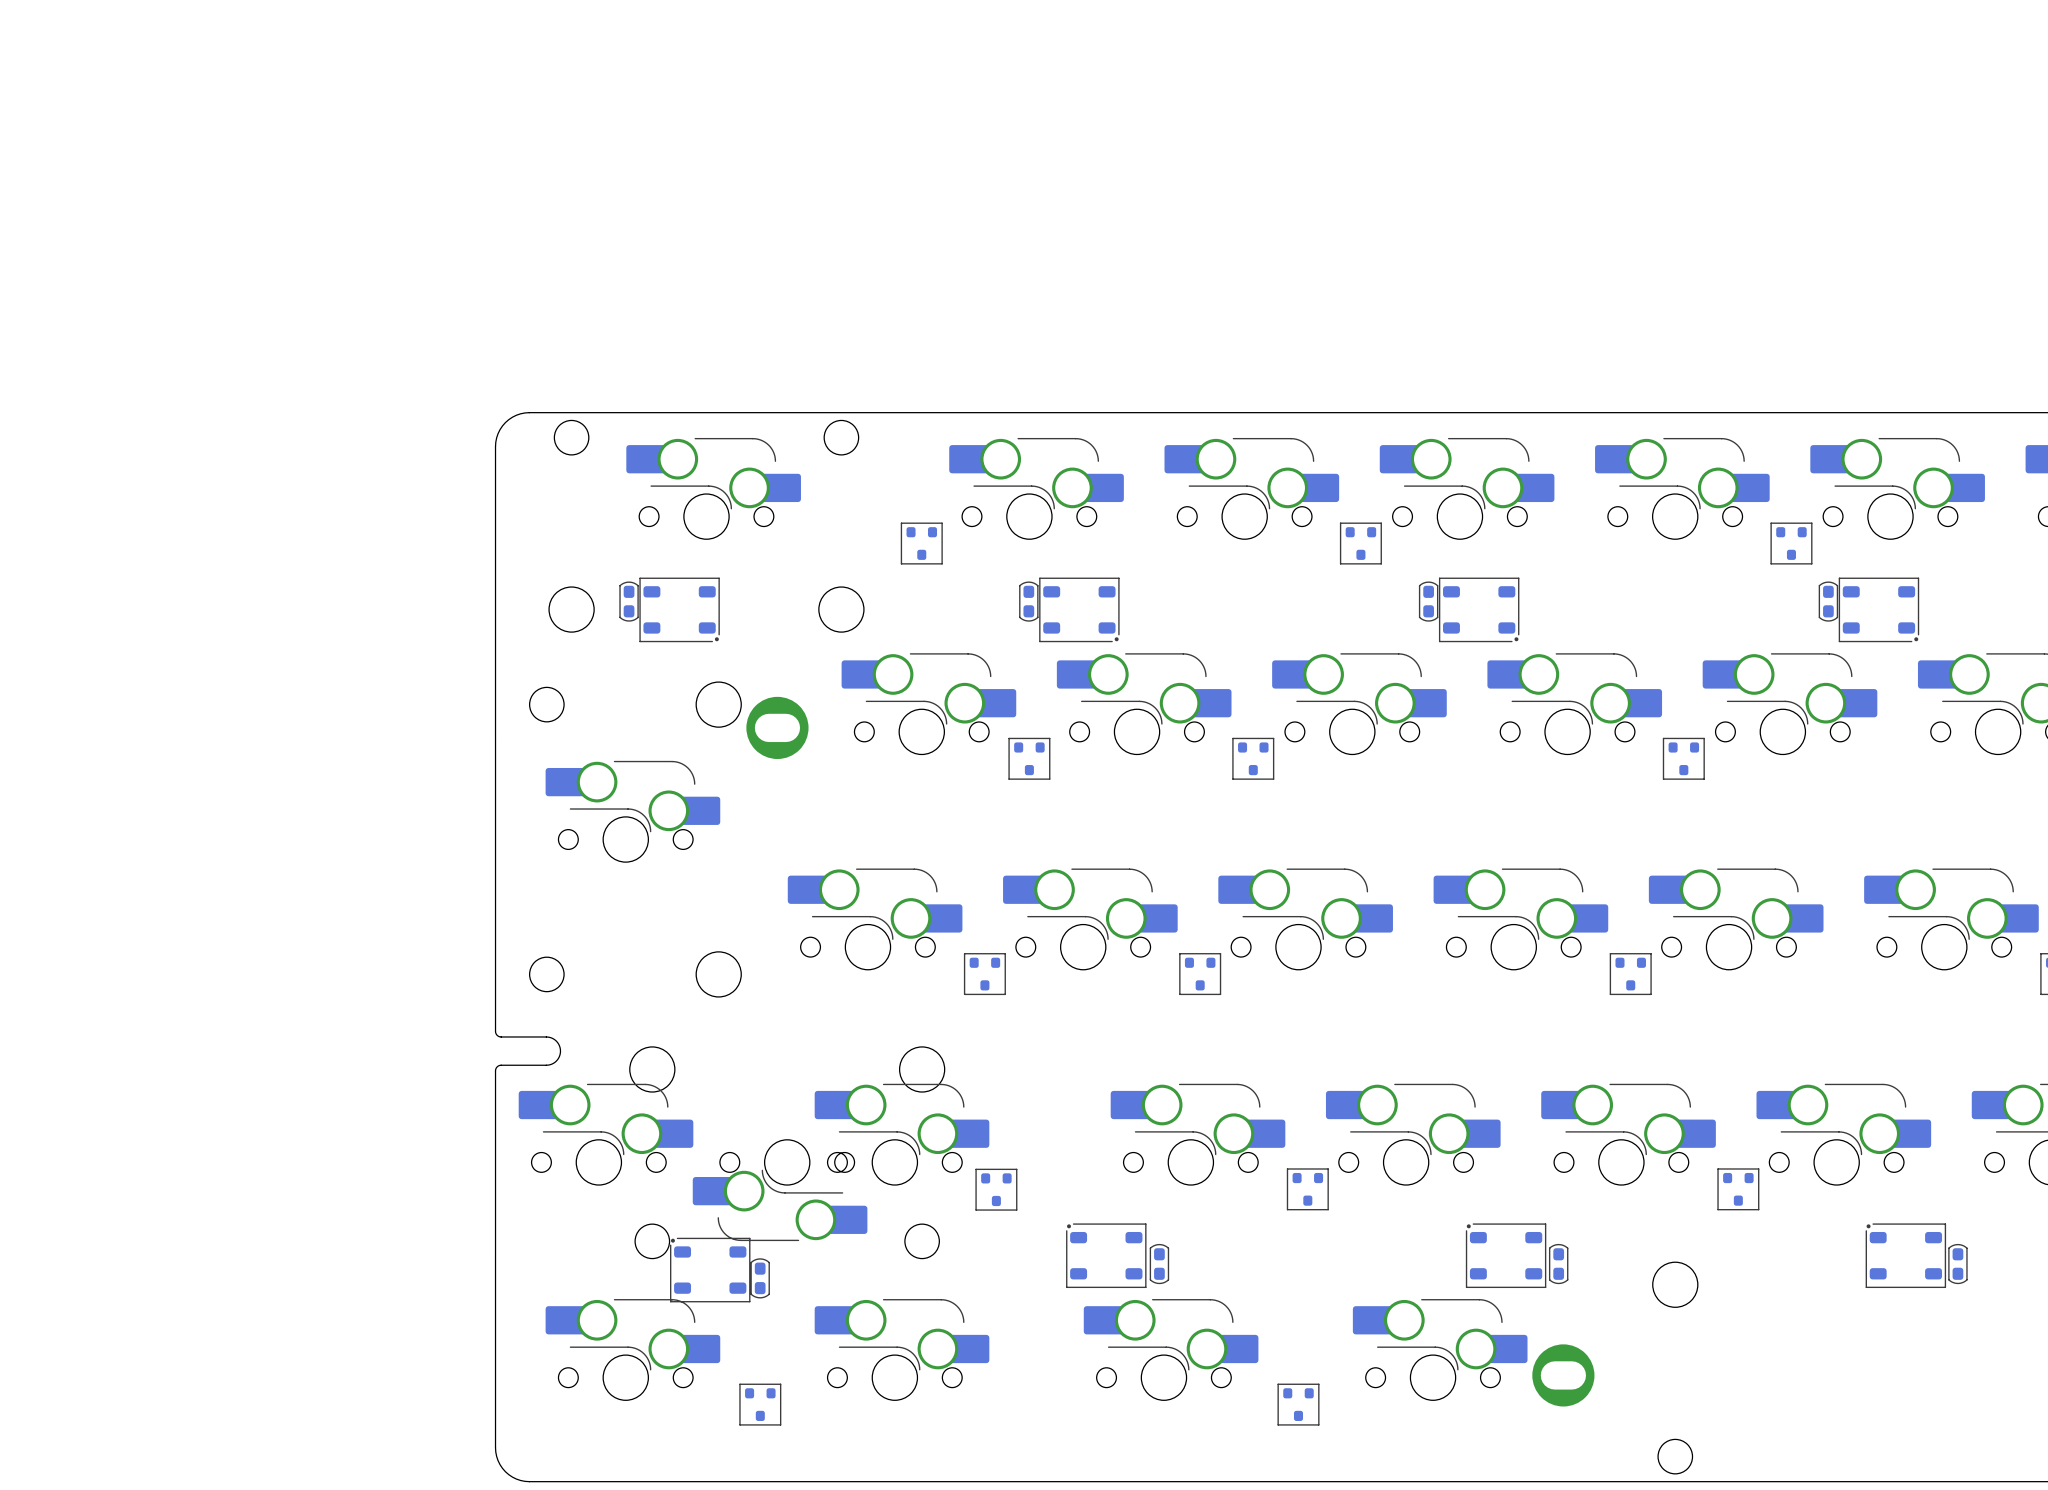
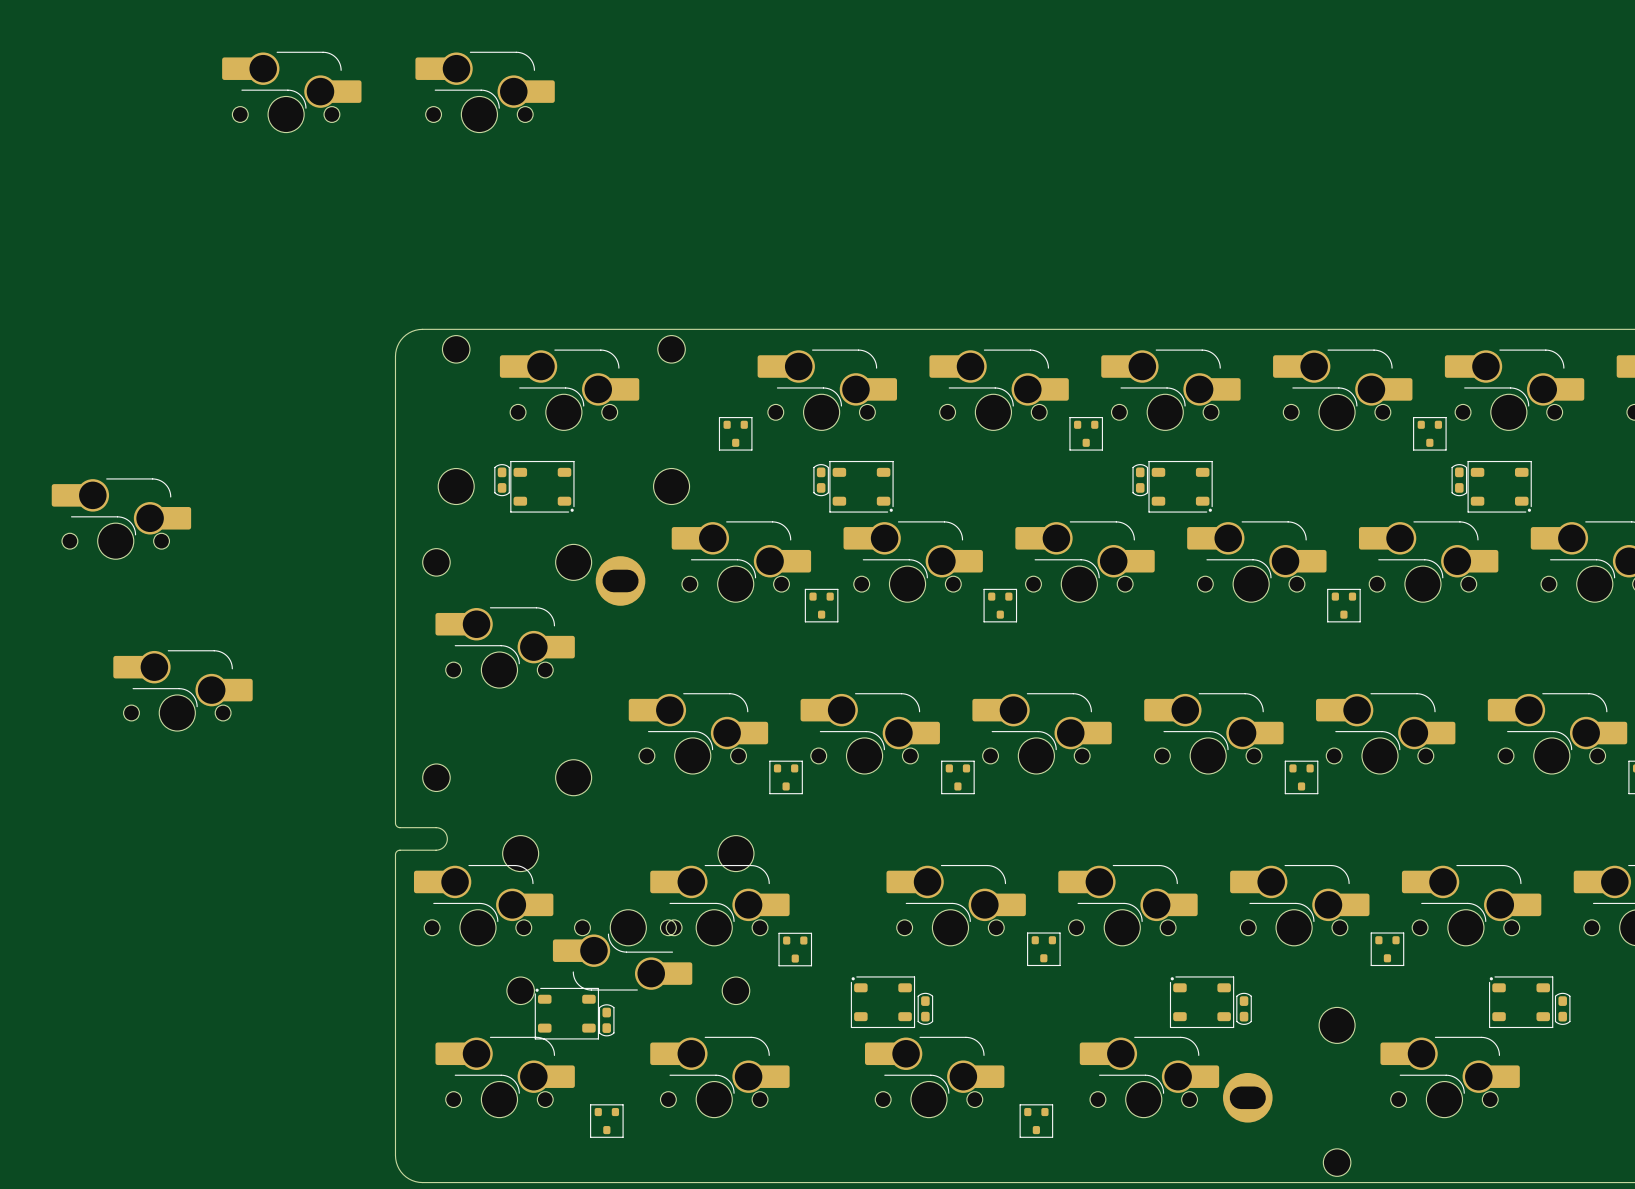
part: none -> (291, 92)
part: none -> (485, 92)
part: none -> (121, 518)
part: none -> (183, 690)
part: none -> (1450, 1077)

